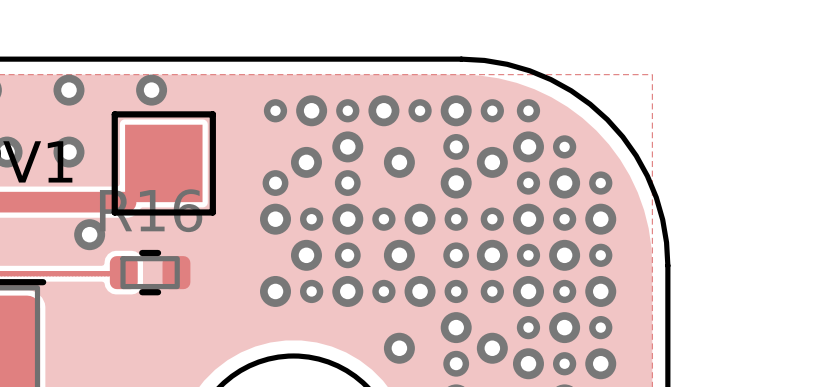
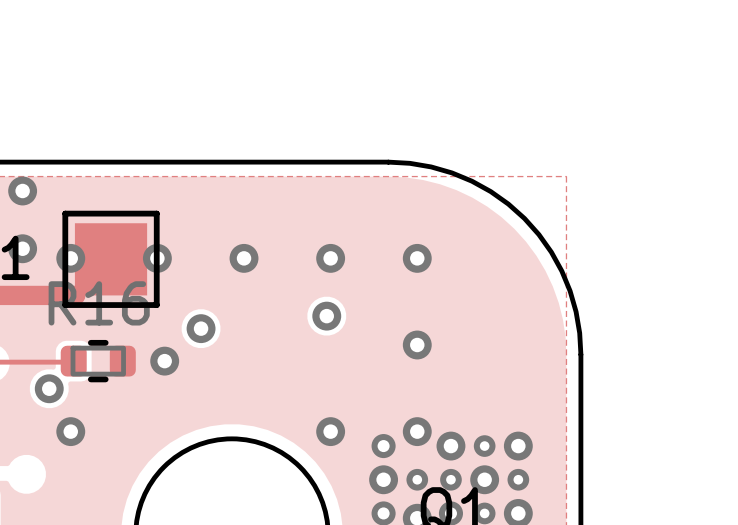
via: (151, 90) -> none
via: (275, 110) -> none
via: (311, 110) -> none
via: (347, 110) -> none
via: (383, 110) -> none
via: (420, 110) -> none
via: (456, 110) -> none
via: (492, 110) -> none
via: (528, 110) -> none
via: (347, 146) -> none
via: (456, 146) -> none
via: (528, 146) -> none
via: (564, 146) -> none
via: none -> (70, 258)
via: none -> (157, 258)
via: (275, 183) -> none
via: (347, 183) -> none
via: (456, 183) -> none
via: (528, 183) -> none
via: (564, 183) -> none
via: (600, 183) -> none
via position: (275, 219) -> (201, 328)
via: (311, 219) -> none
via: (347, 219) -> none
via: (383, 219) -> none
via: (420, 219) -> none
via: (456, 219) -> none
via: (492, 219) -> none
via: (528, 219) -> none
via: (564, 219) -> none
via: (600, 219) -> none
via: none -> (326, 316)
via: (89, 234) -> none
via: (306, 255) -> none
via: (347, 255) -> none
via: (399, 255) -> none
via: (456, 255) -> none
via: (528, 255) -> none
via: (564, 255) -> none
via: (600, 255) -> none
via: none -> (164, 361)
via: (275, 291) -> none
via: (311, 291) -> none
via: (347, 291) -> none
via: (383, 291) -> none
via: (420, 291) -> none
via: (456, 291) -> none
via: (492, 291) -> none
via: (528, 291) -> none
via: (564, 291) -> none
via: (600, 291) -> none
via: none -> (49, 388)
via: (456, 327) -> none
via: (528, 327) -> none
via: (564, 327) -> none
via: (600, 327) -> none
via: none -> (70, 431)

